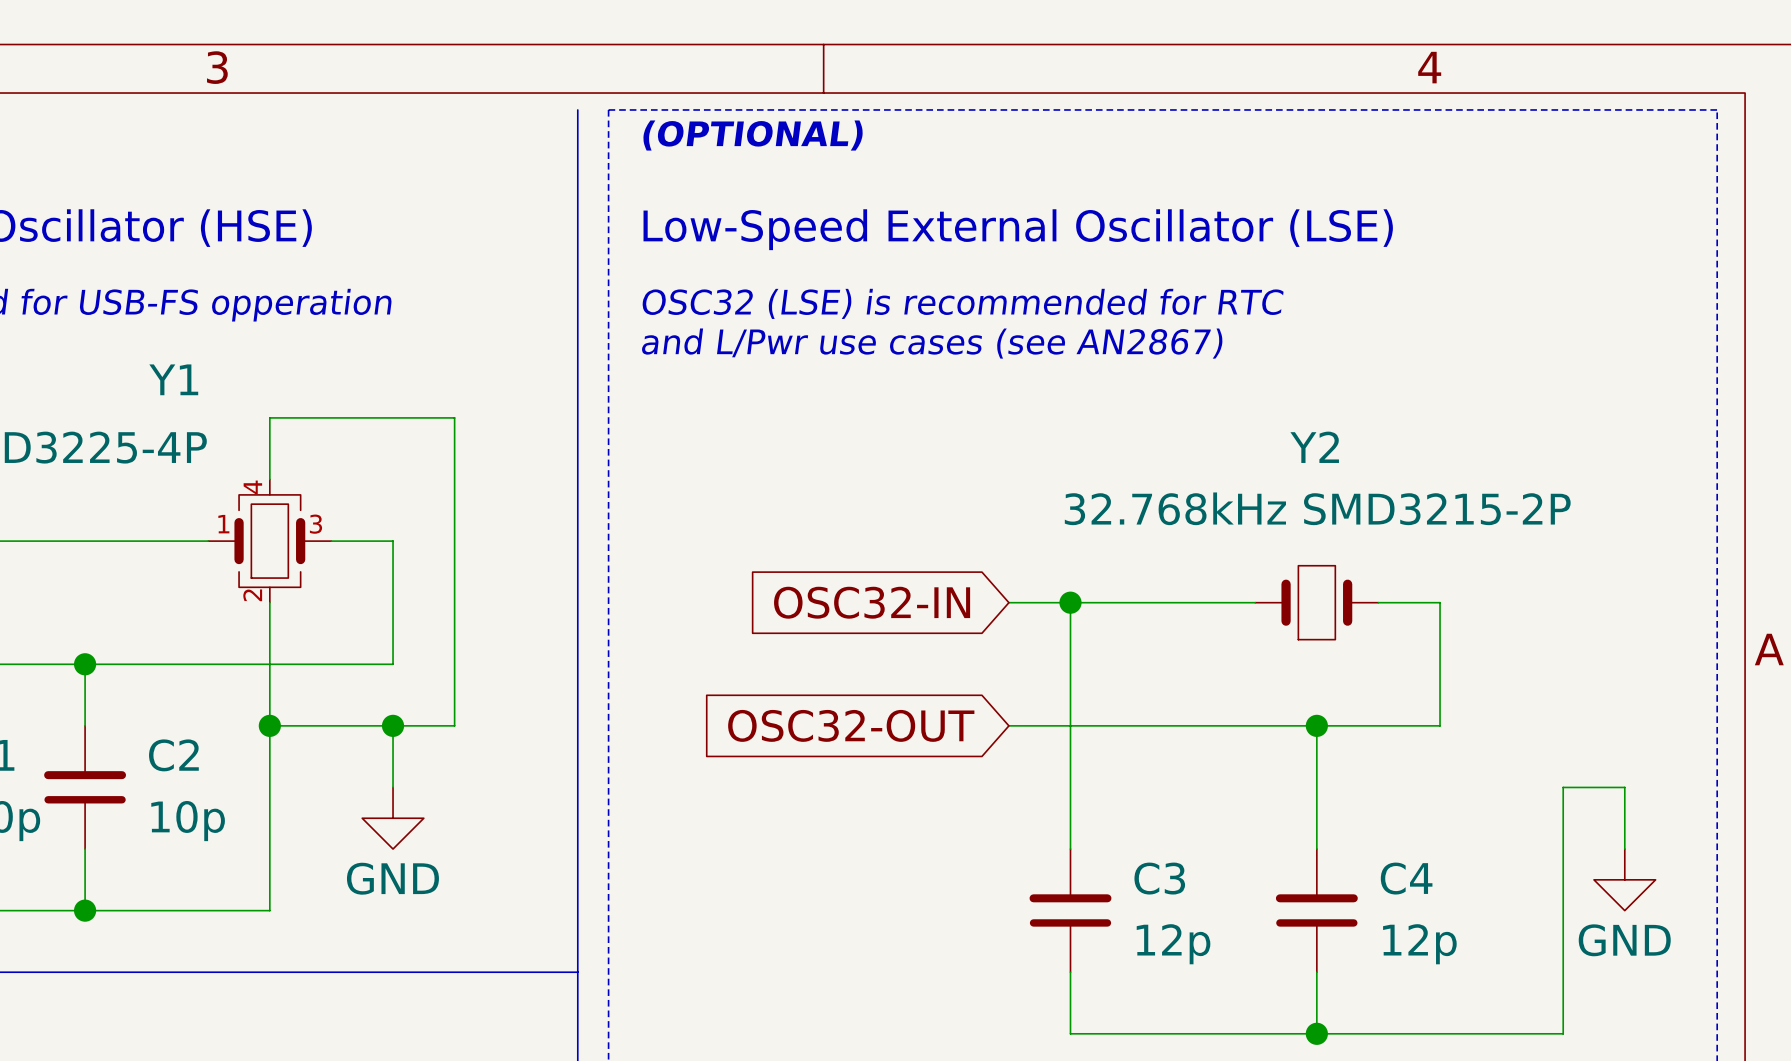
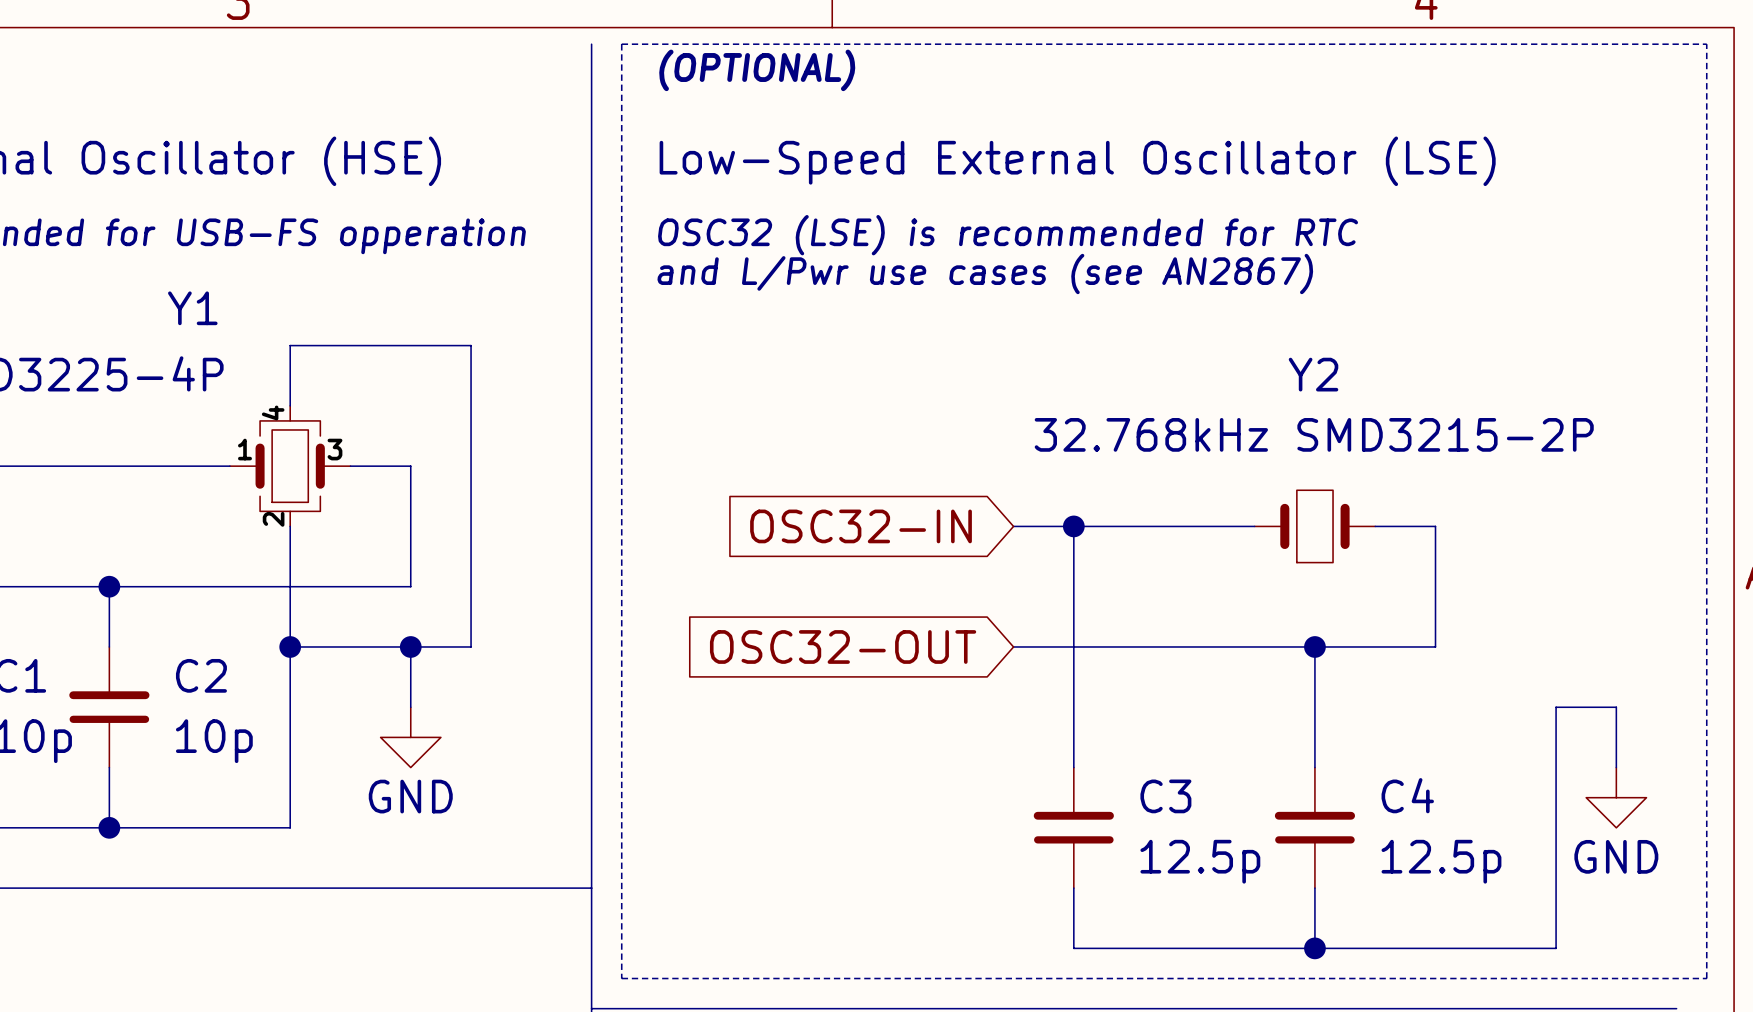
C3 value: 12p (1173, 944) -> 12.5p (1200, 861)
C4 value: 12p (1419, 944) -> 12.5p (1441, 861)

